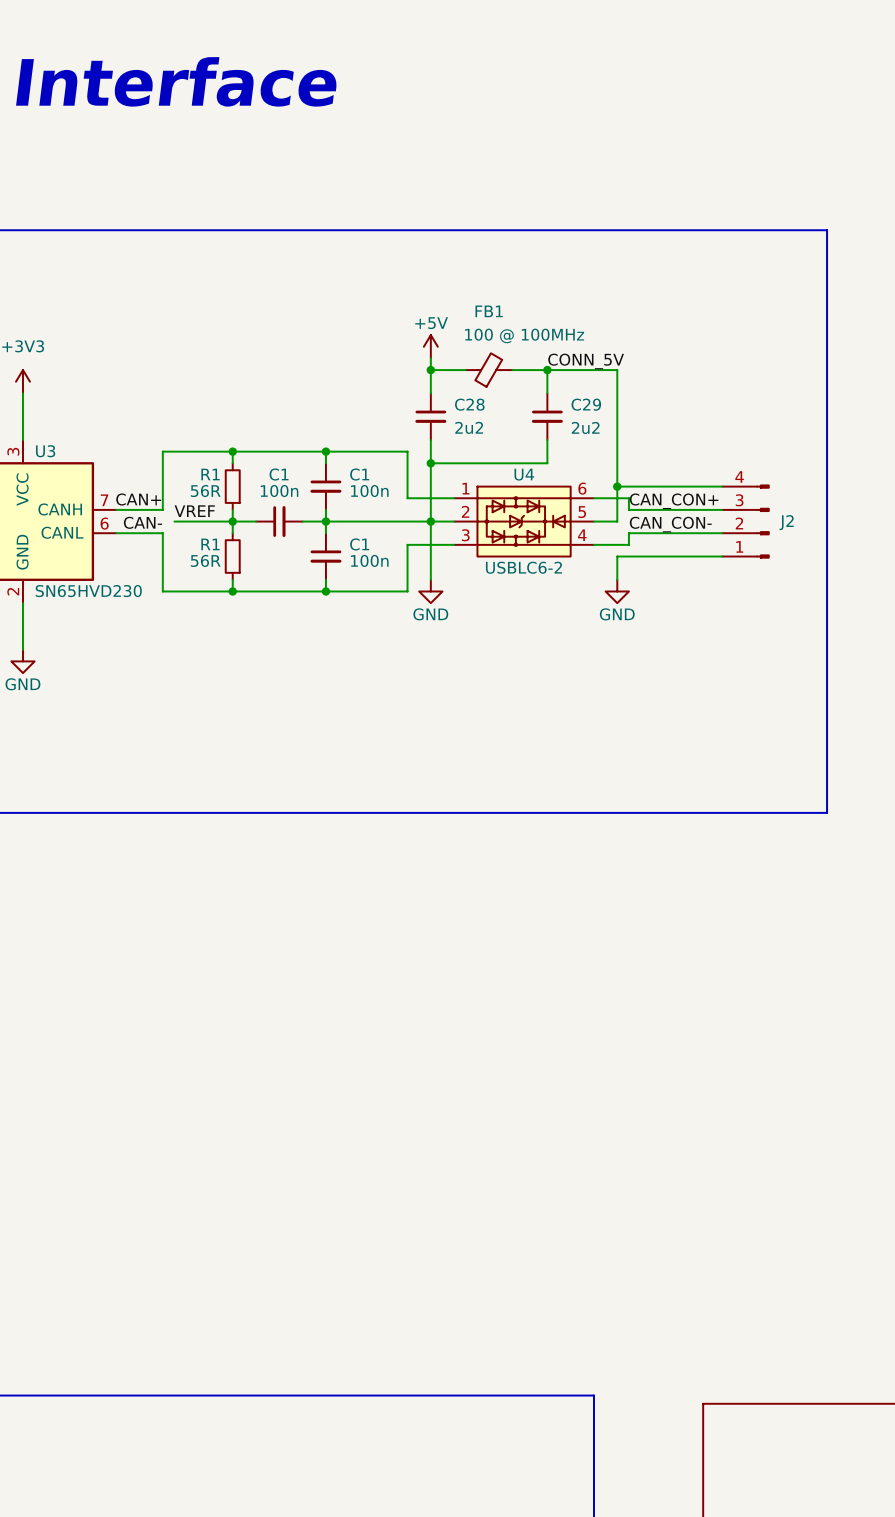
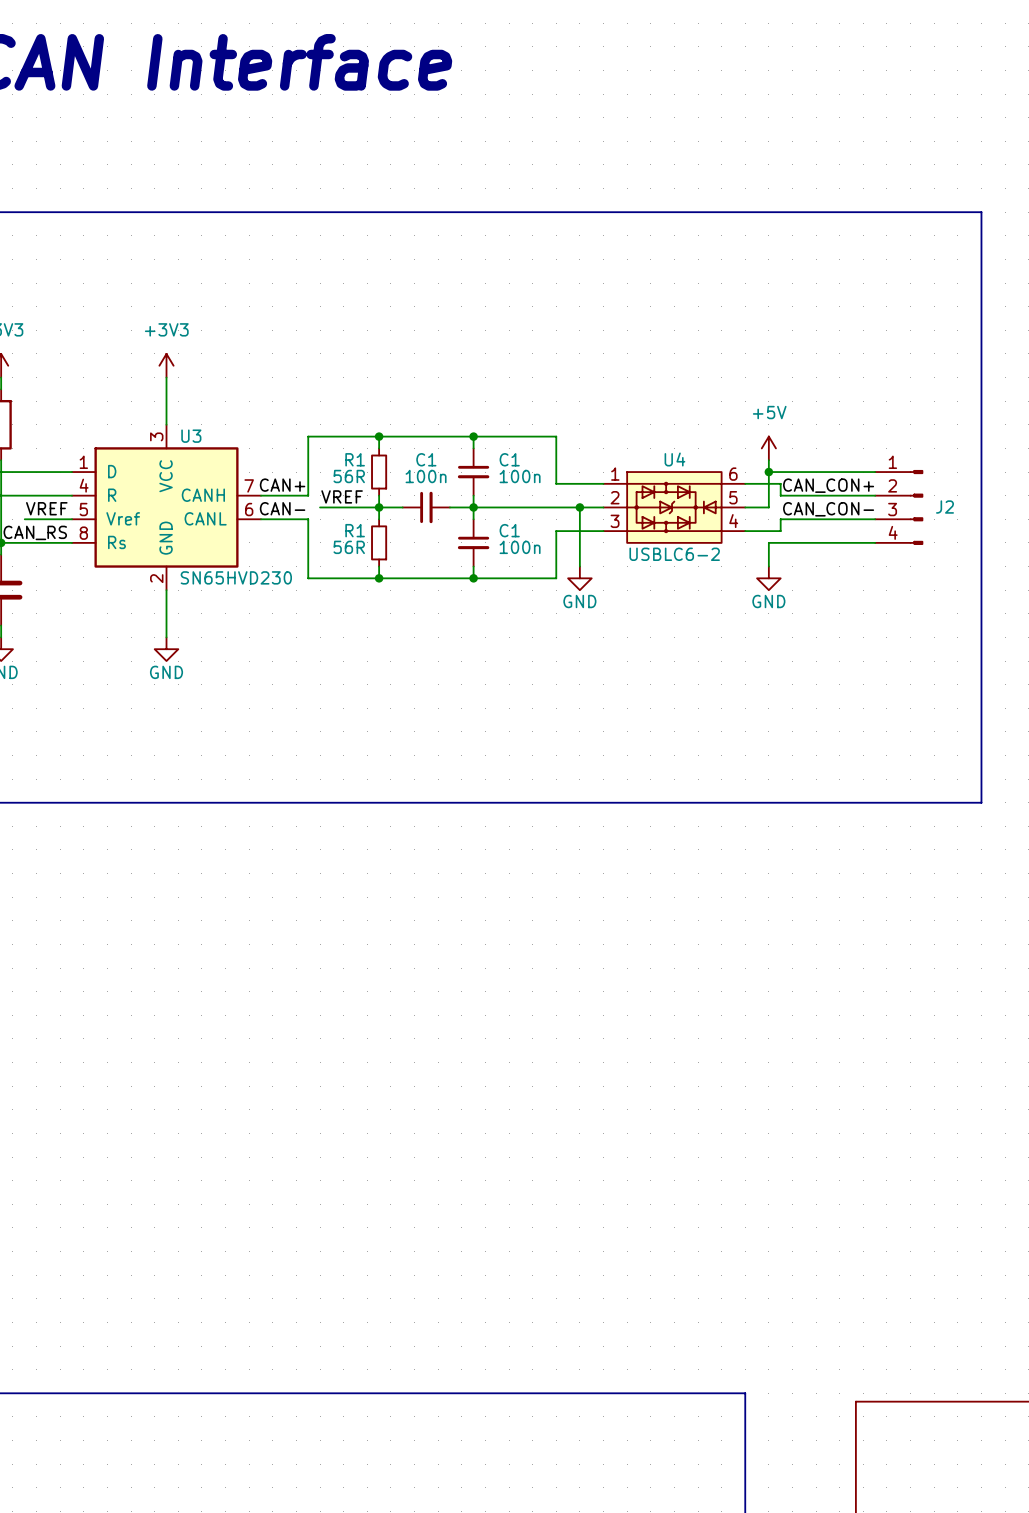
power symbol text position: +5V (431, 323) -> +5V (769, 412)
power symbol position: +5V (430, 346) -> +5V (768, 448)
wire: (430, 358) (430, 393) -> none
label: CONN_5V (586, 361) -> none
wire: (430, 370) (465, 370) -> none
junction: (430, 370) -> none
FB1: 100 @ 100MHz (489, 370) -> none
wire: (512, 370) (617, 370) (617, 474) -> none
wire: (547, 370) (547, 393) -> none
junction: (547, 370) -> none
C28: 2u2 (430, 416) -> none
C29: 2u2 (547, 416) -> none
wire: (430, 439) (430, 521) -> none
wire: (547, 439) (547, 463) (430, 463) -> none
junction: (430, 463) -> none
J2 flip: as is (762, 521) -> up-down (916, 507)

